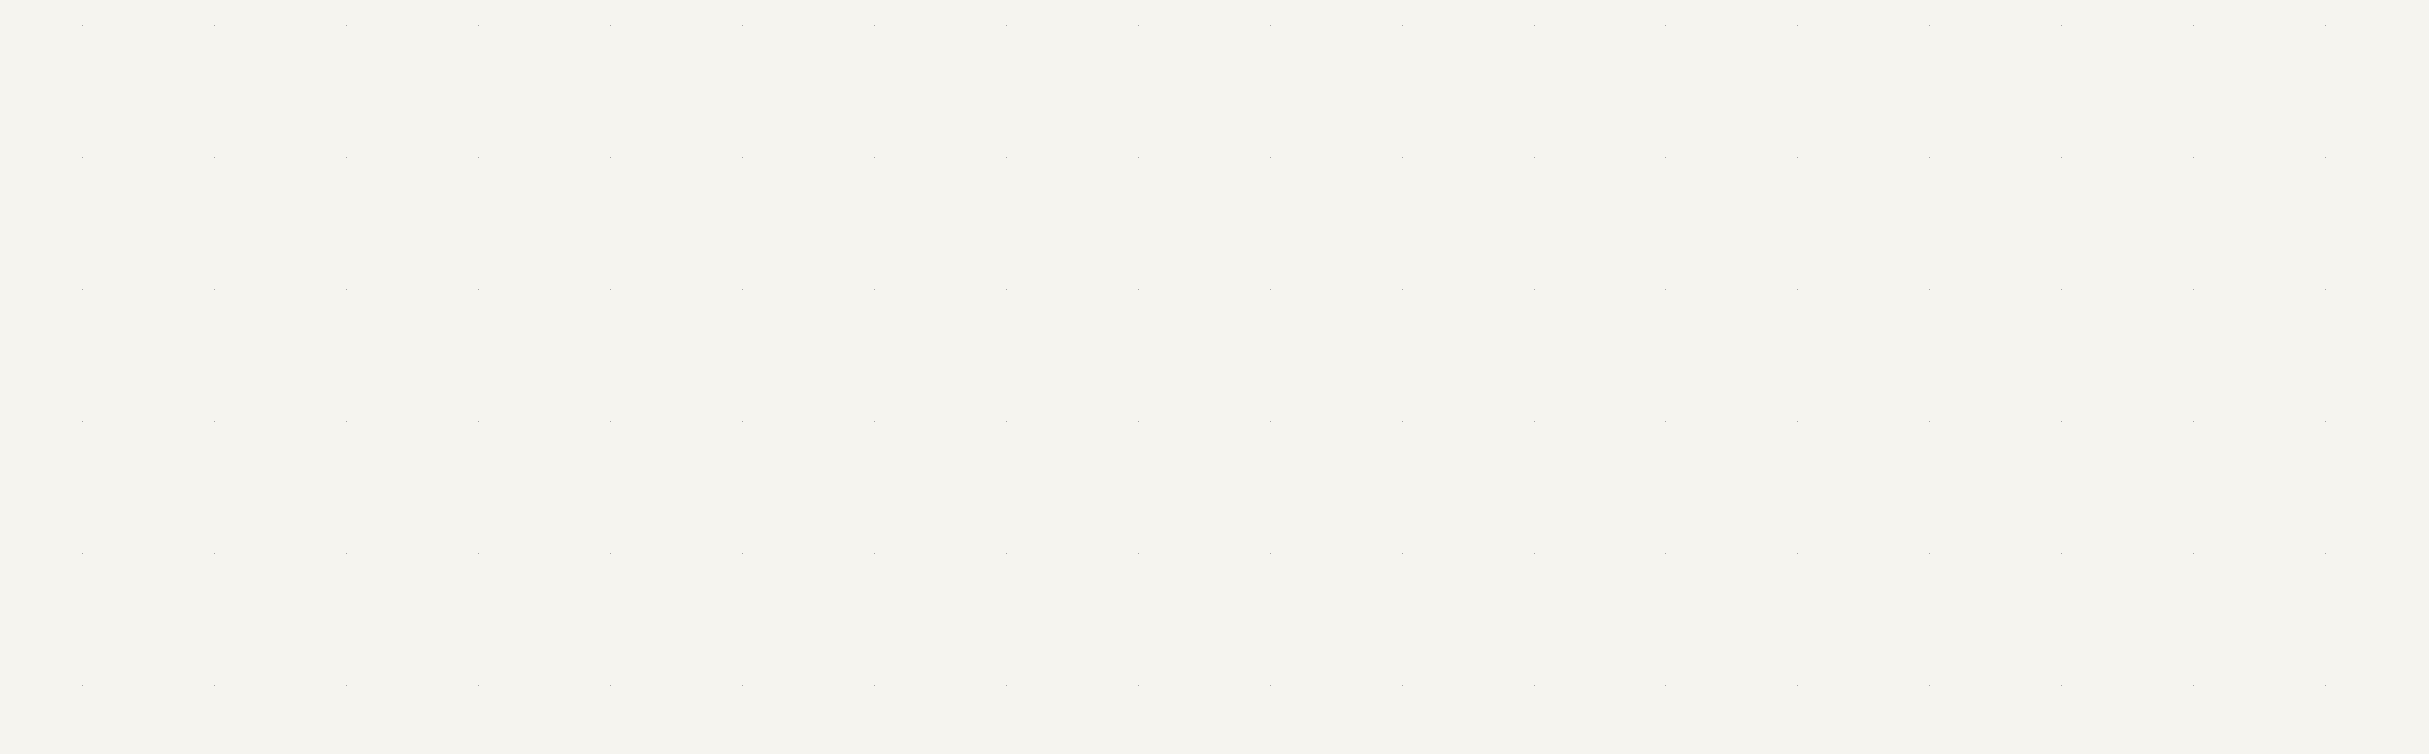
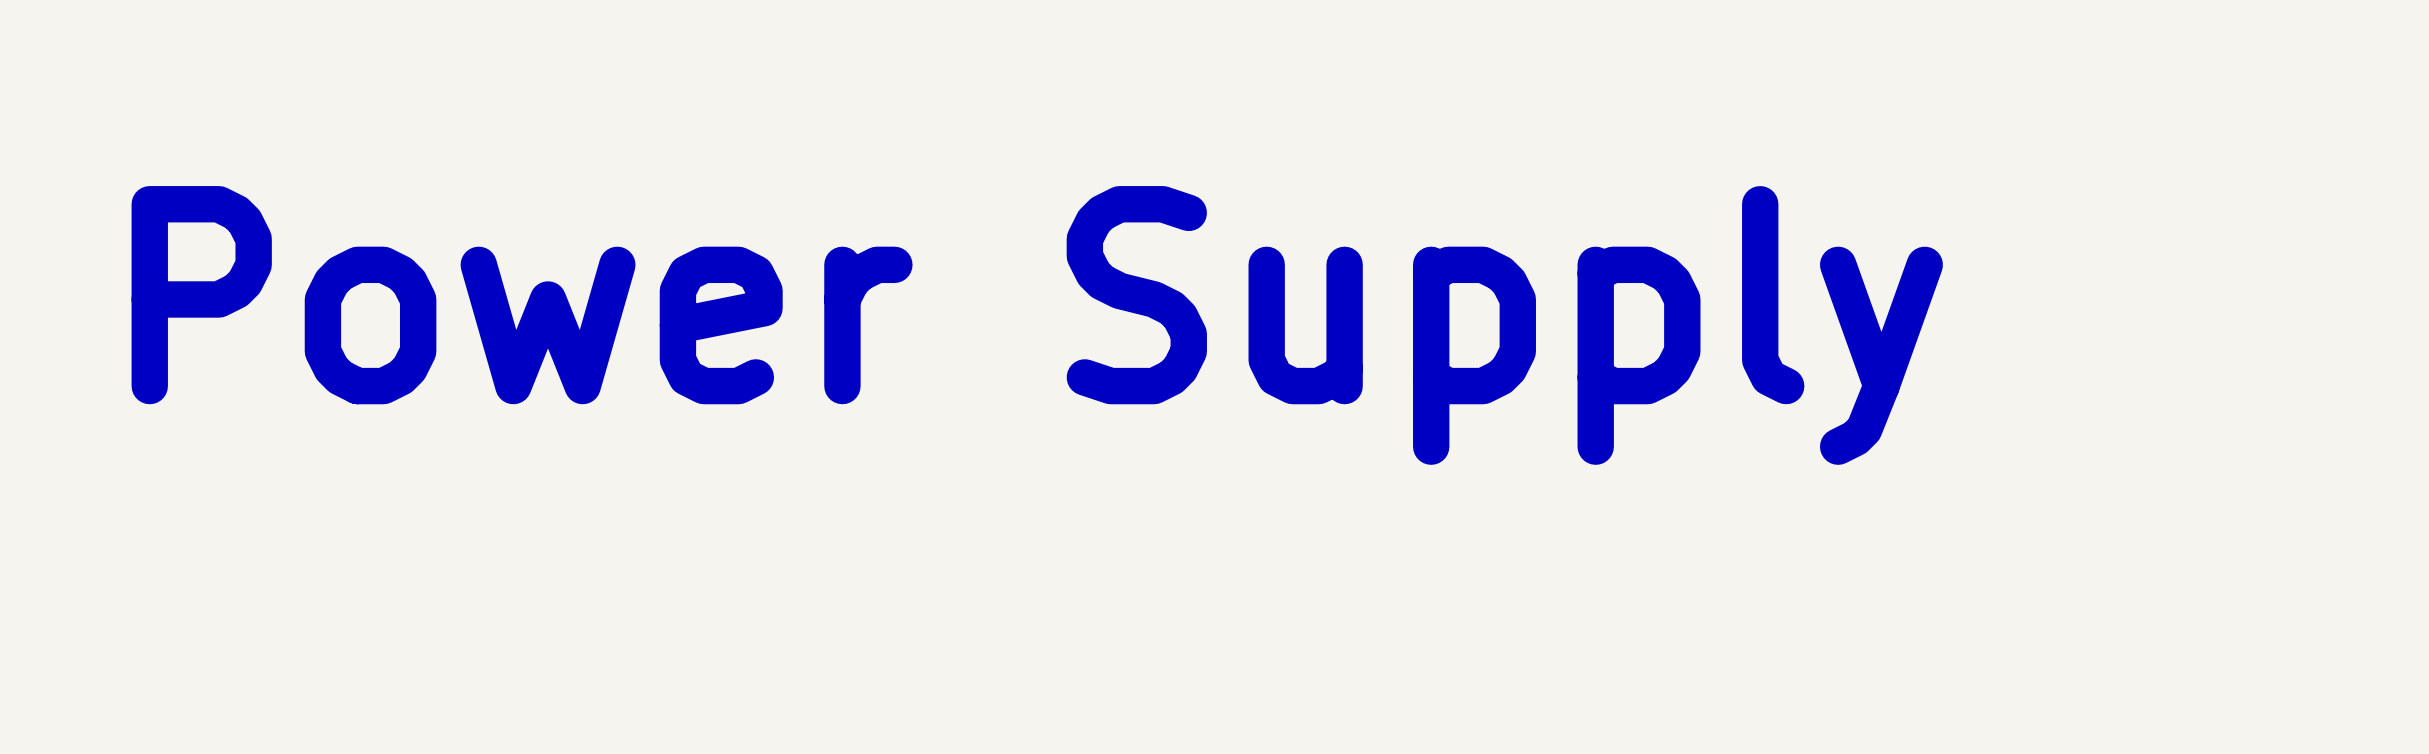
text: none -> Power Supply (1037, 325)

